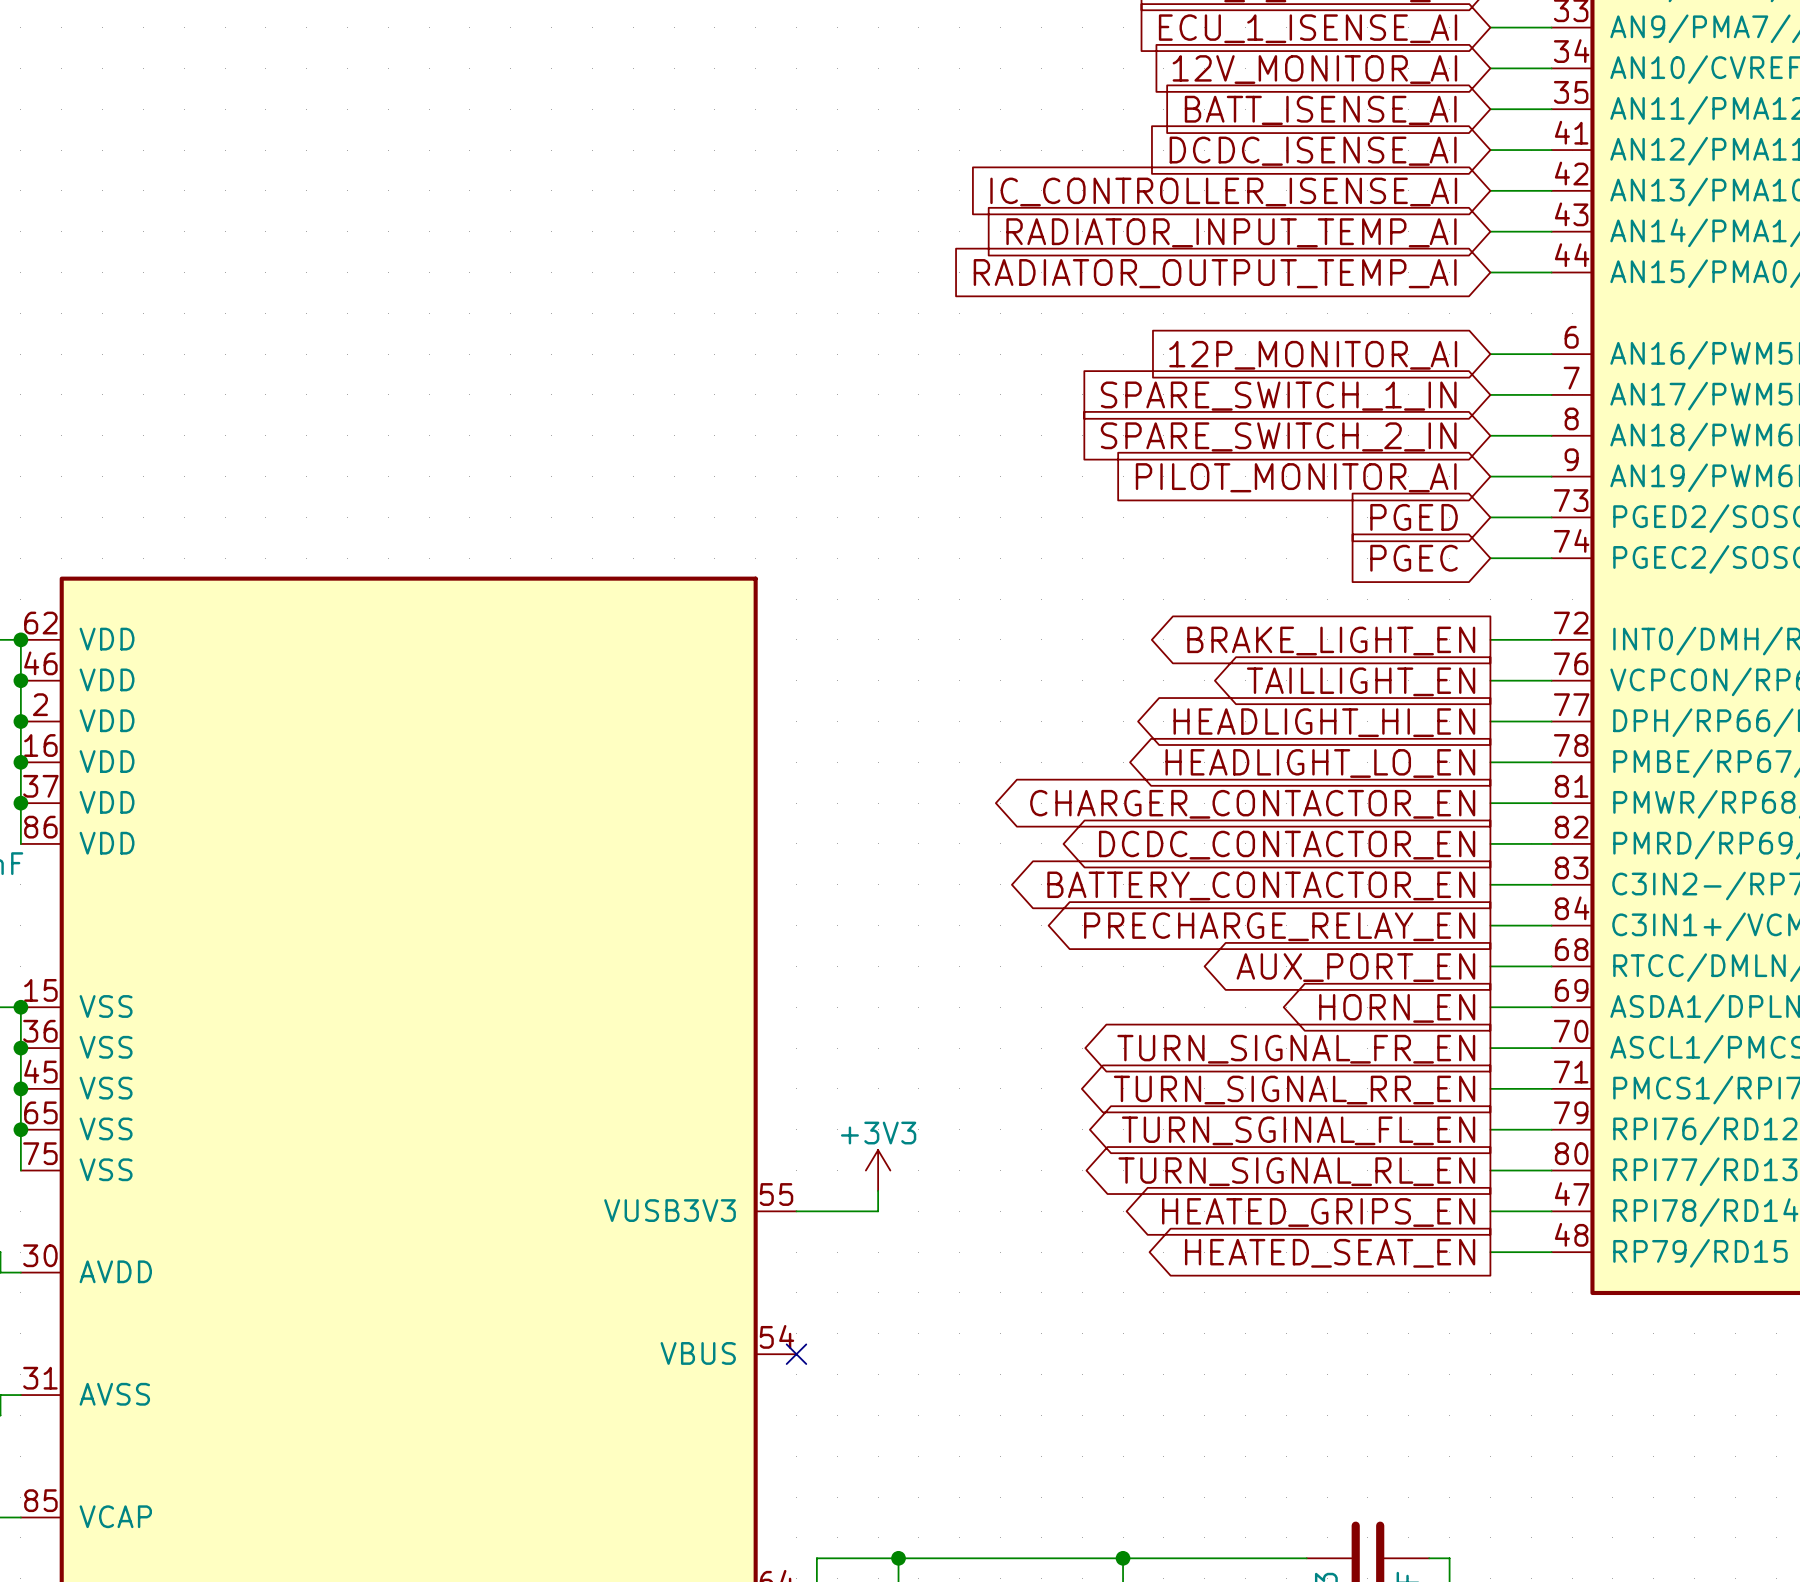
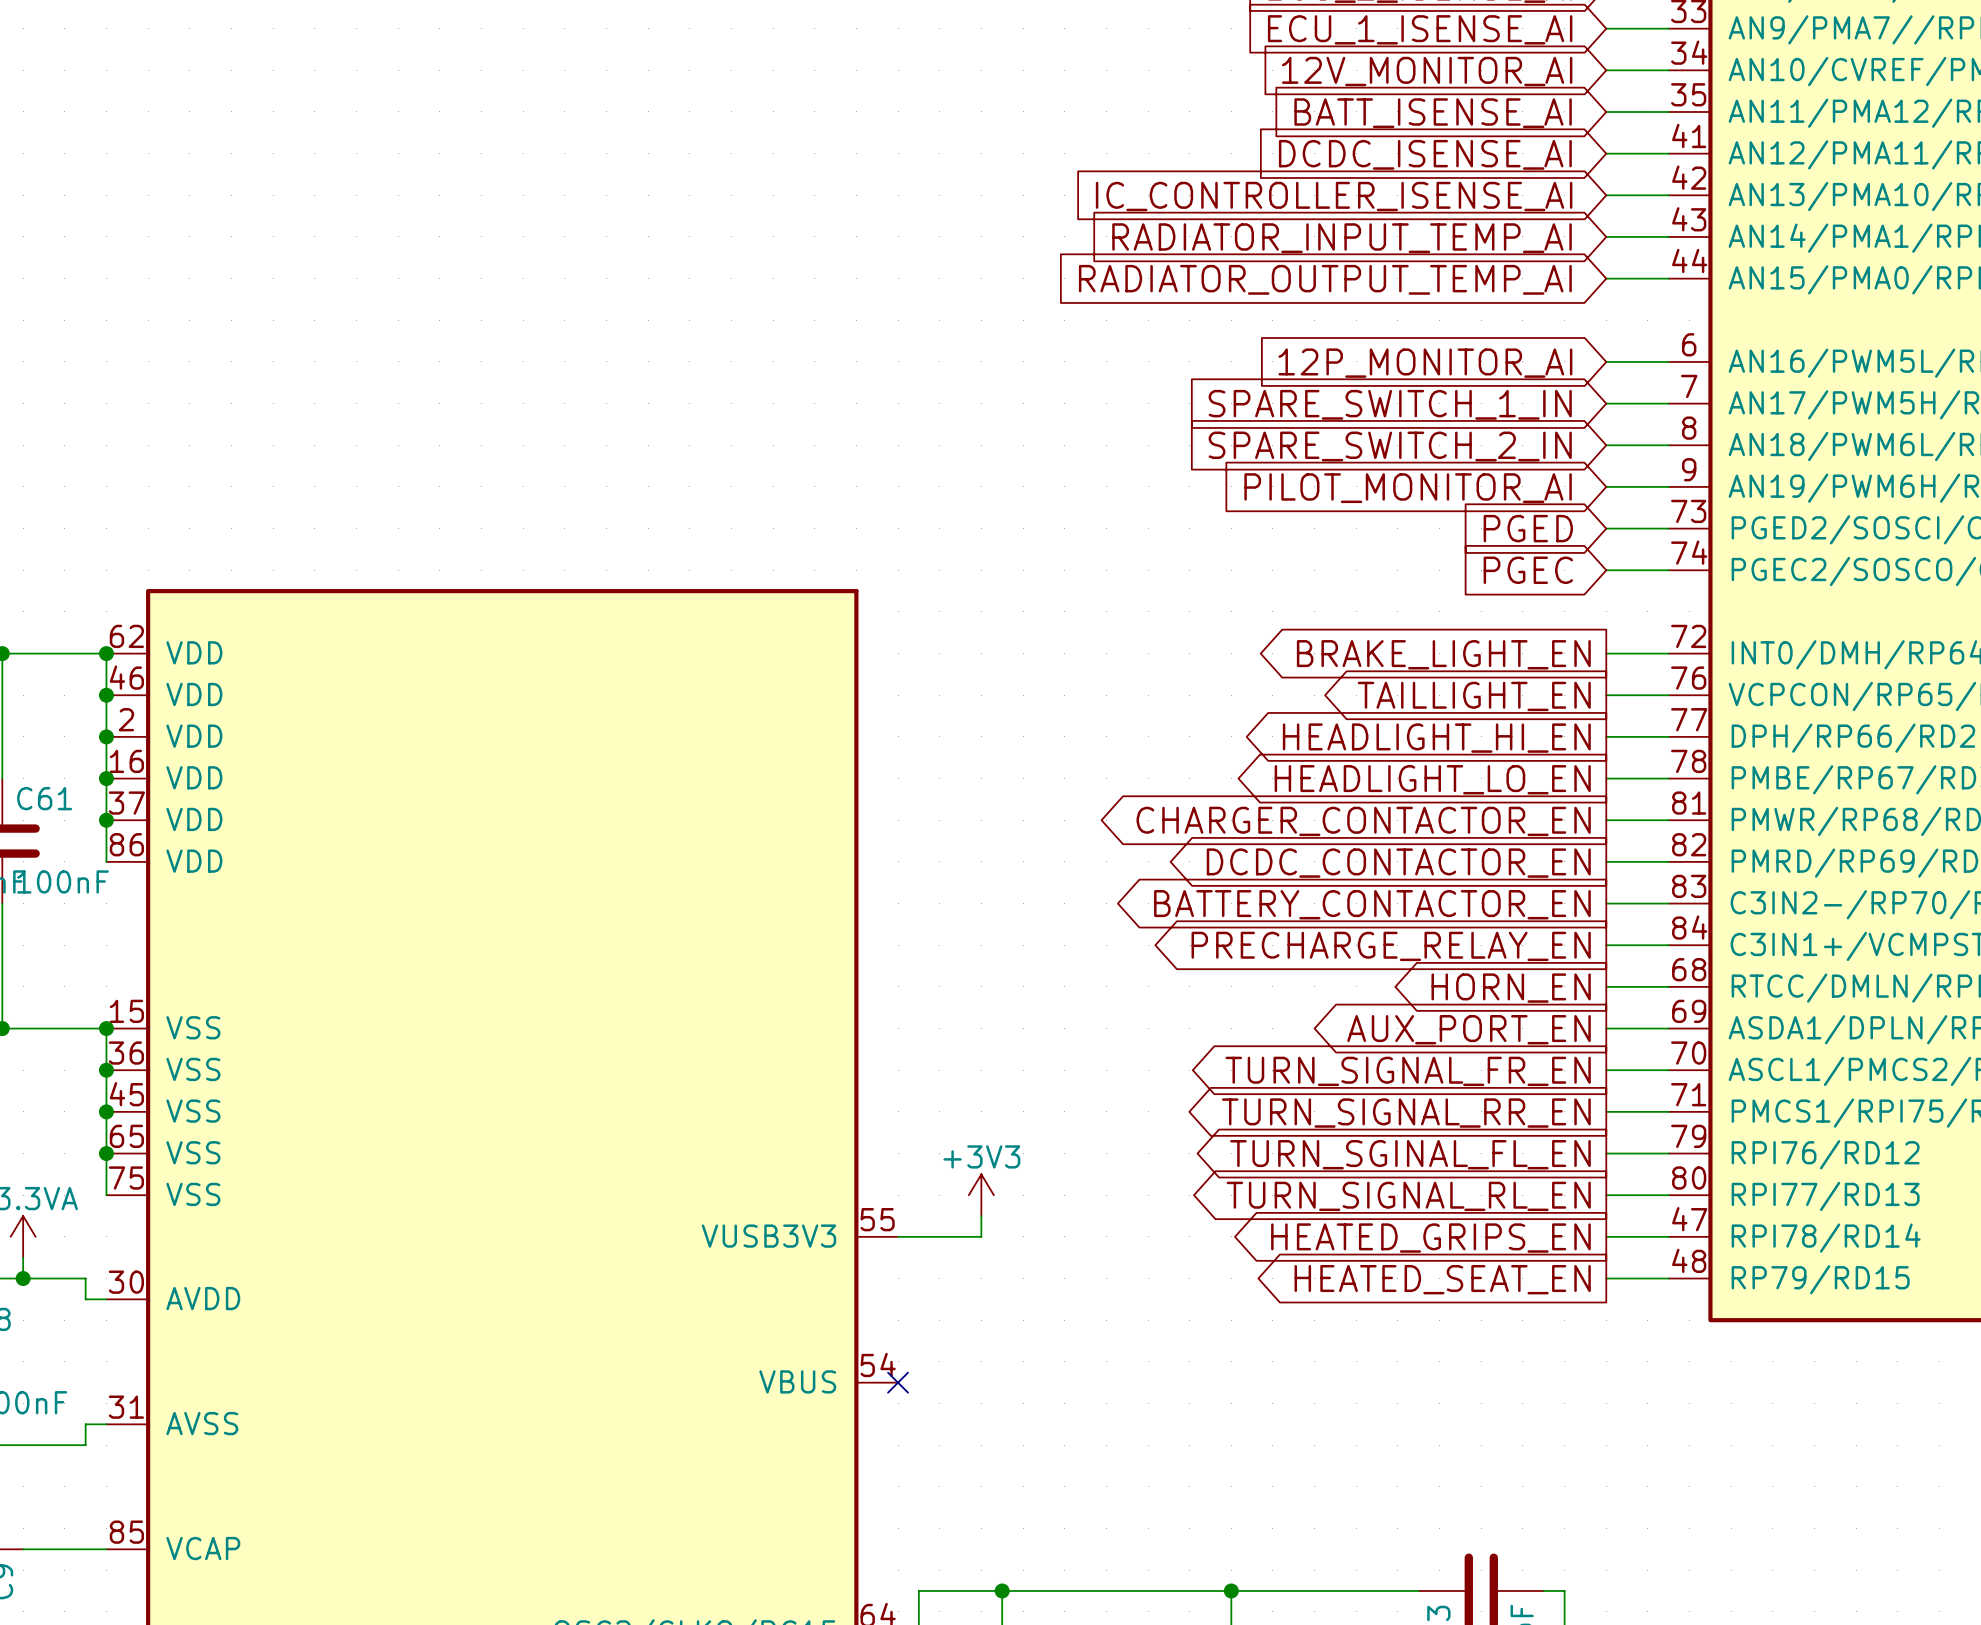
global label: AUX_PORT_EN (1355, 967) -> HORN_EN (1511, 988)
global label: HORN_EN (1397, 1008) -> AUX_PORT_EN (1469, 1029)

